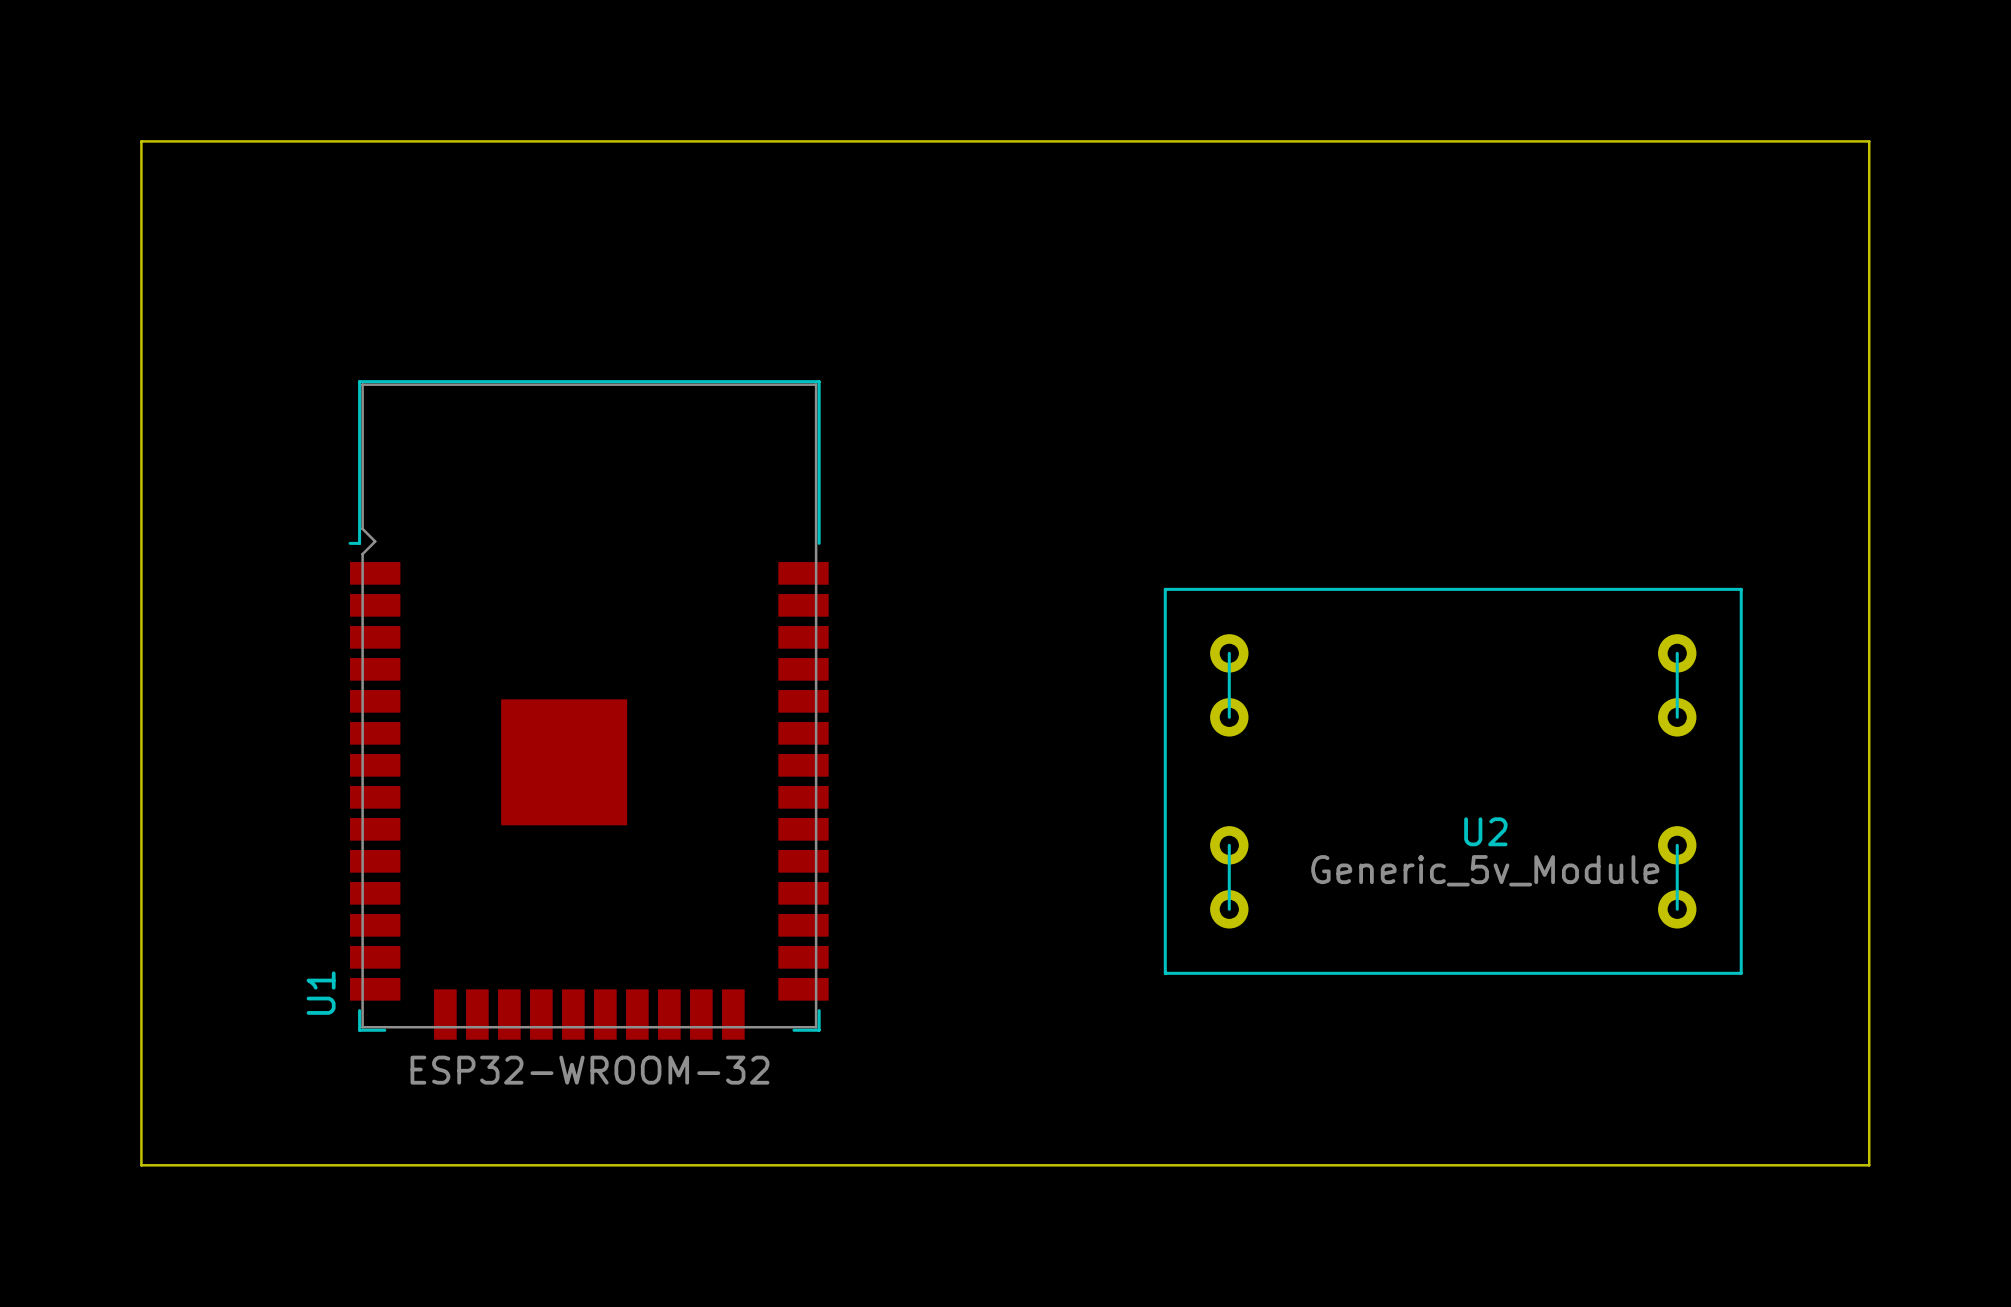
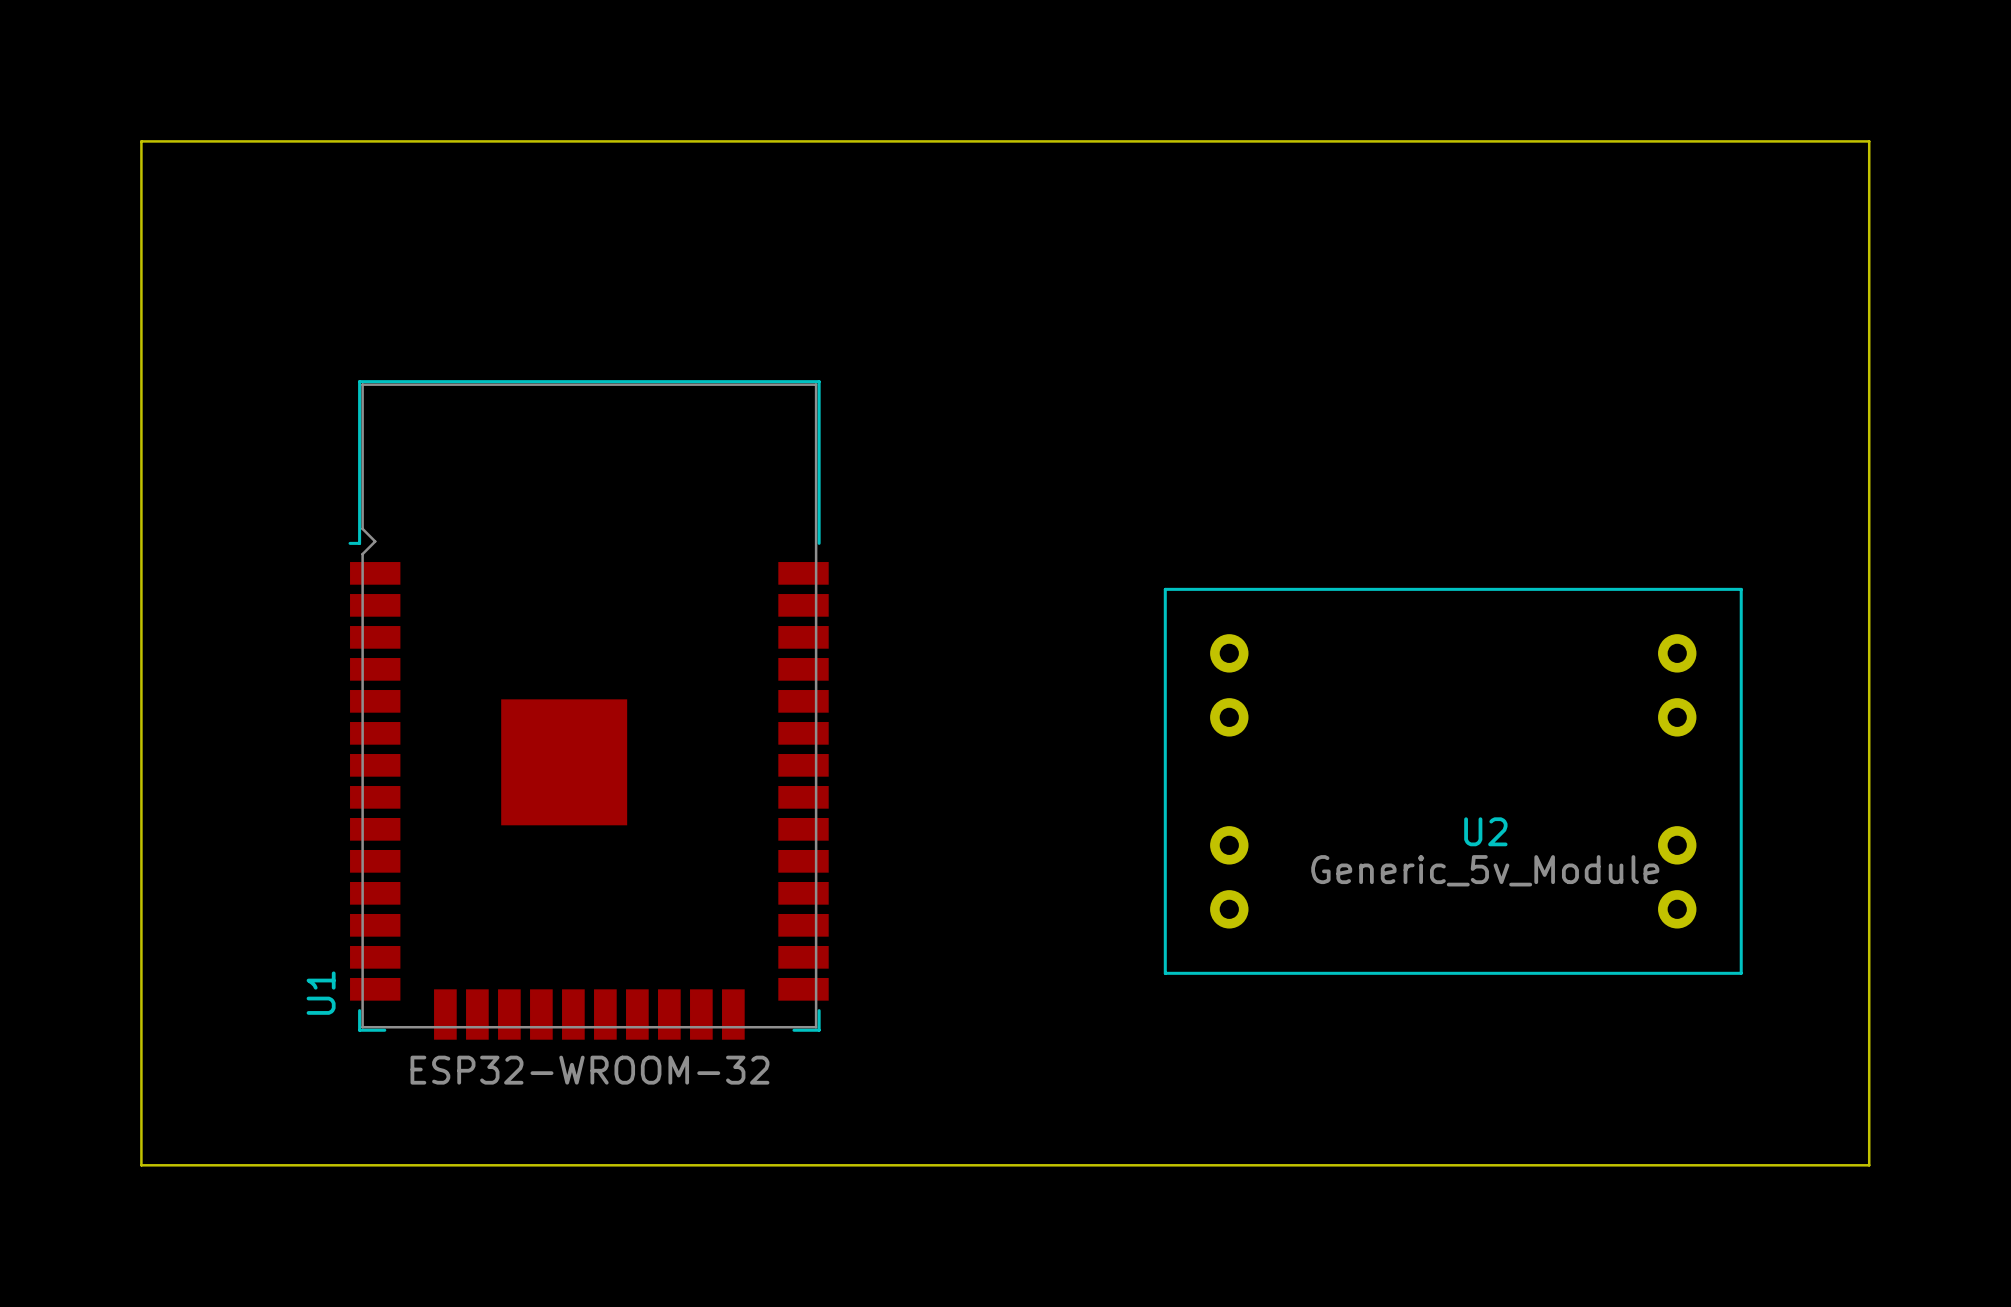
U2 footprint: [1163, 587, 1743, 975] -> [1163, 587, 1743, 975]

